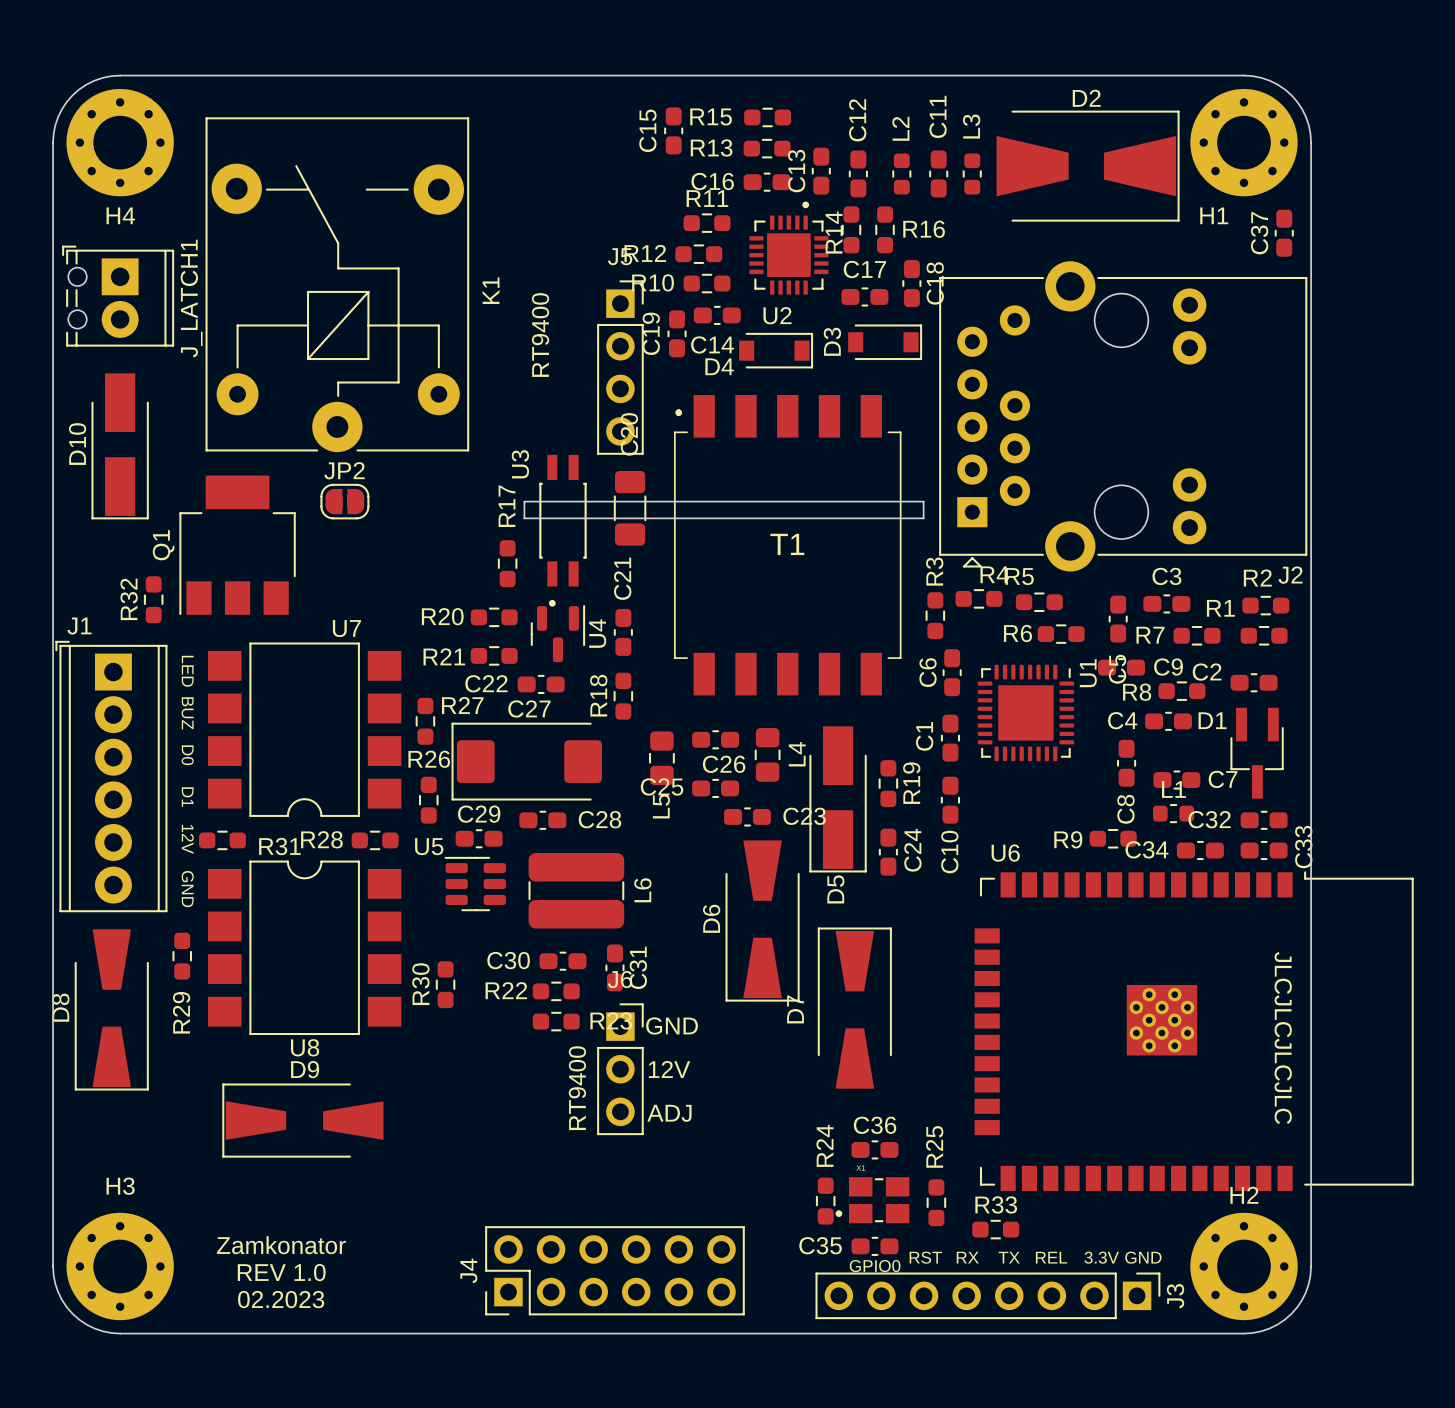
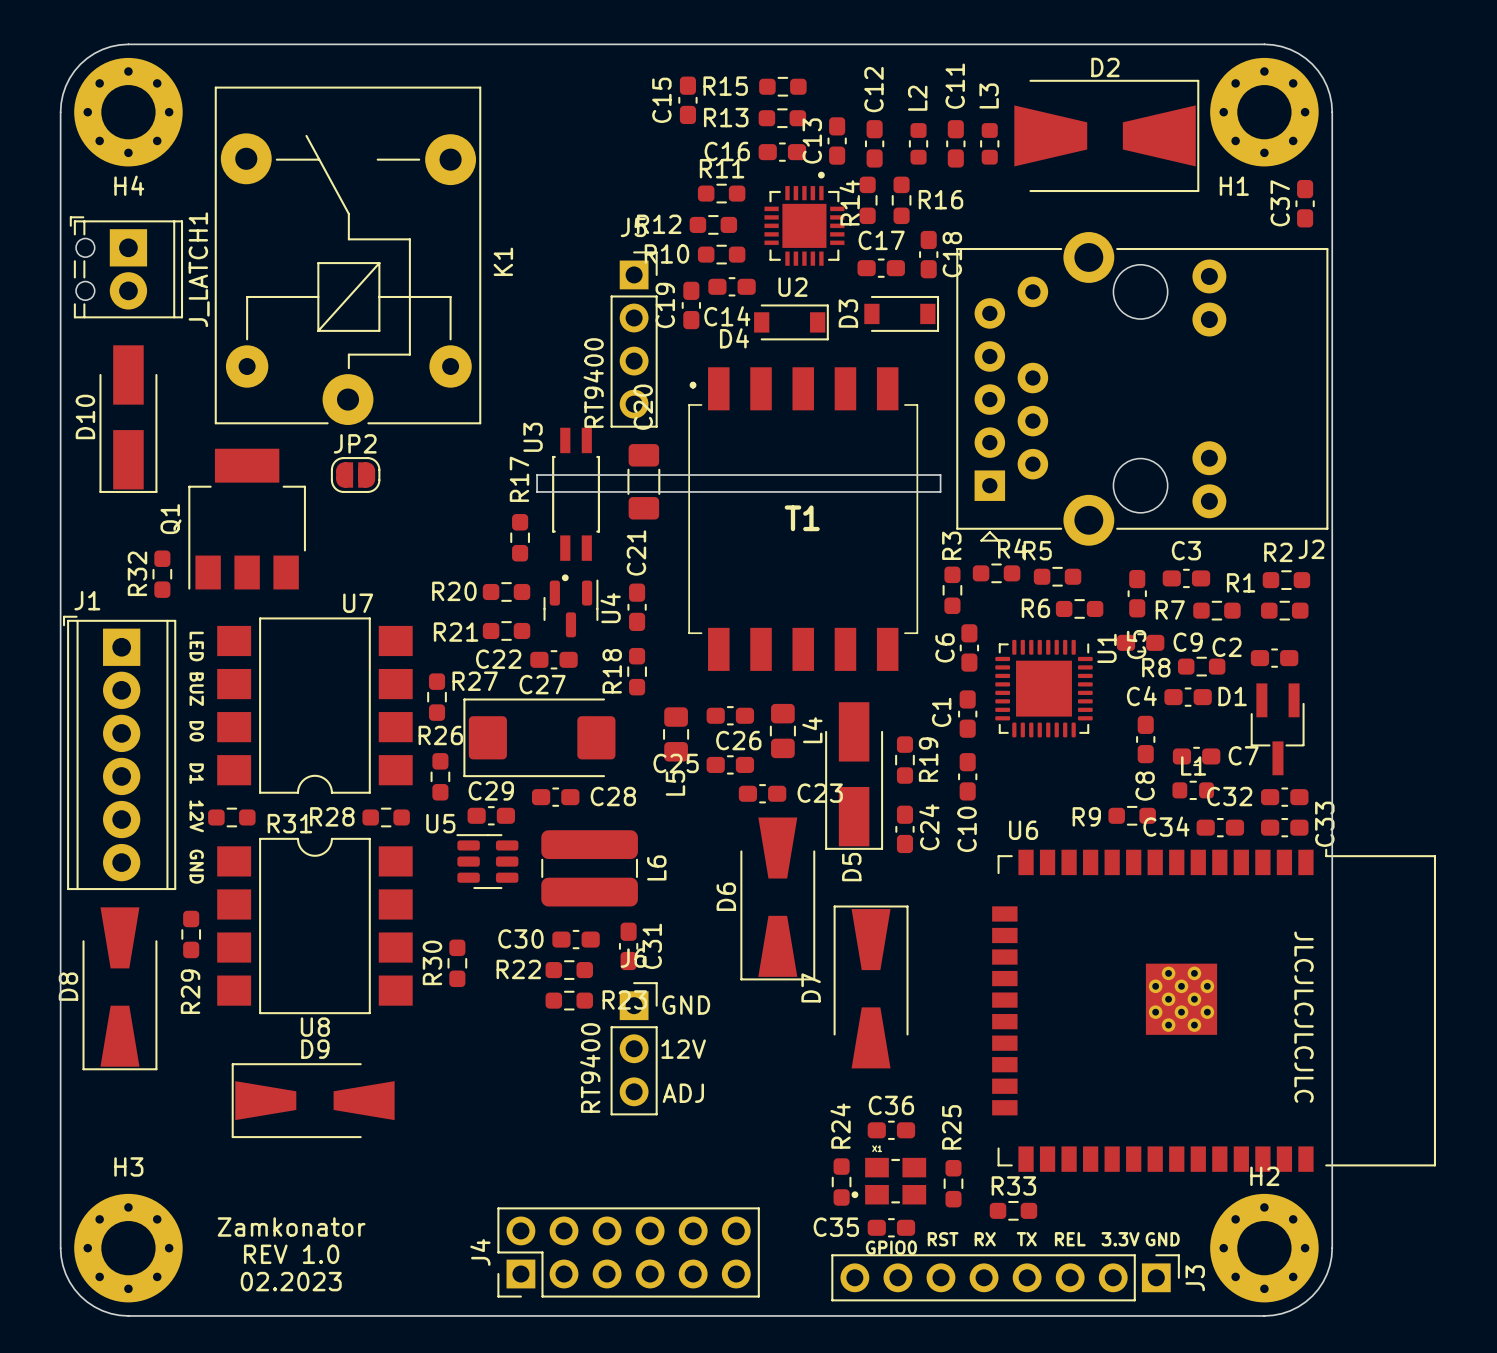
text position: RT9400 (540, 335) -> RT9400 (593, 383)

